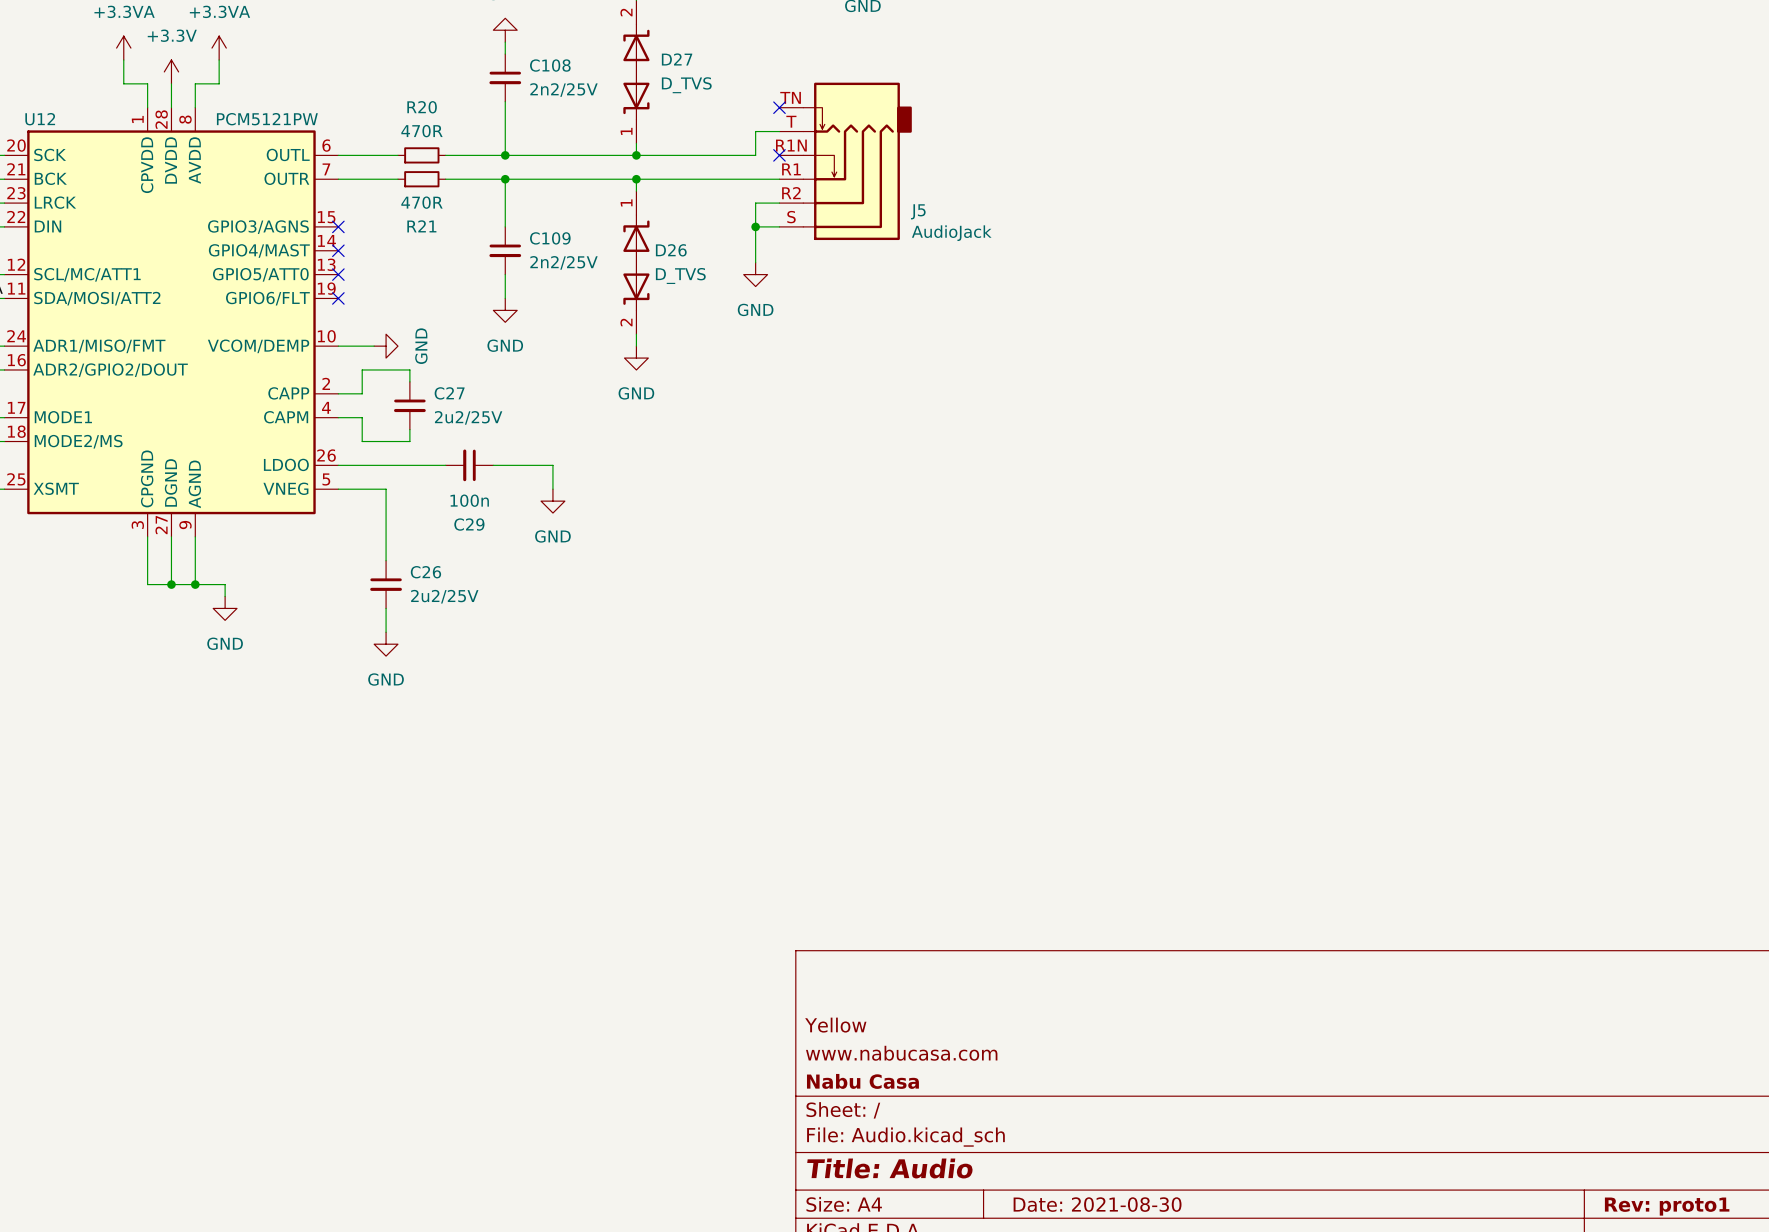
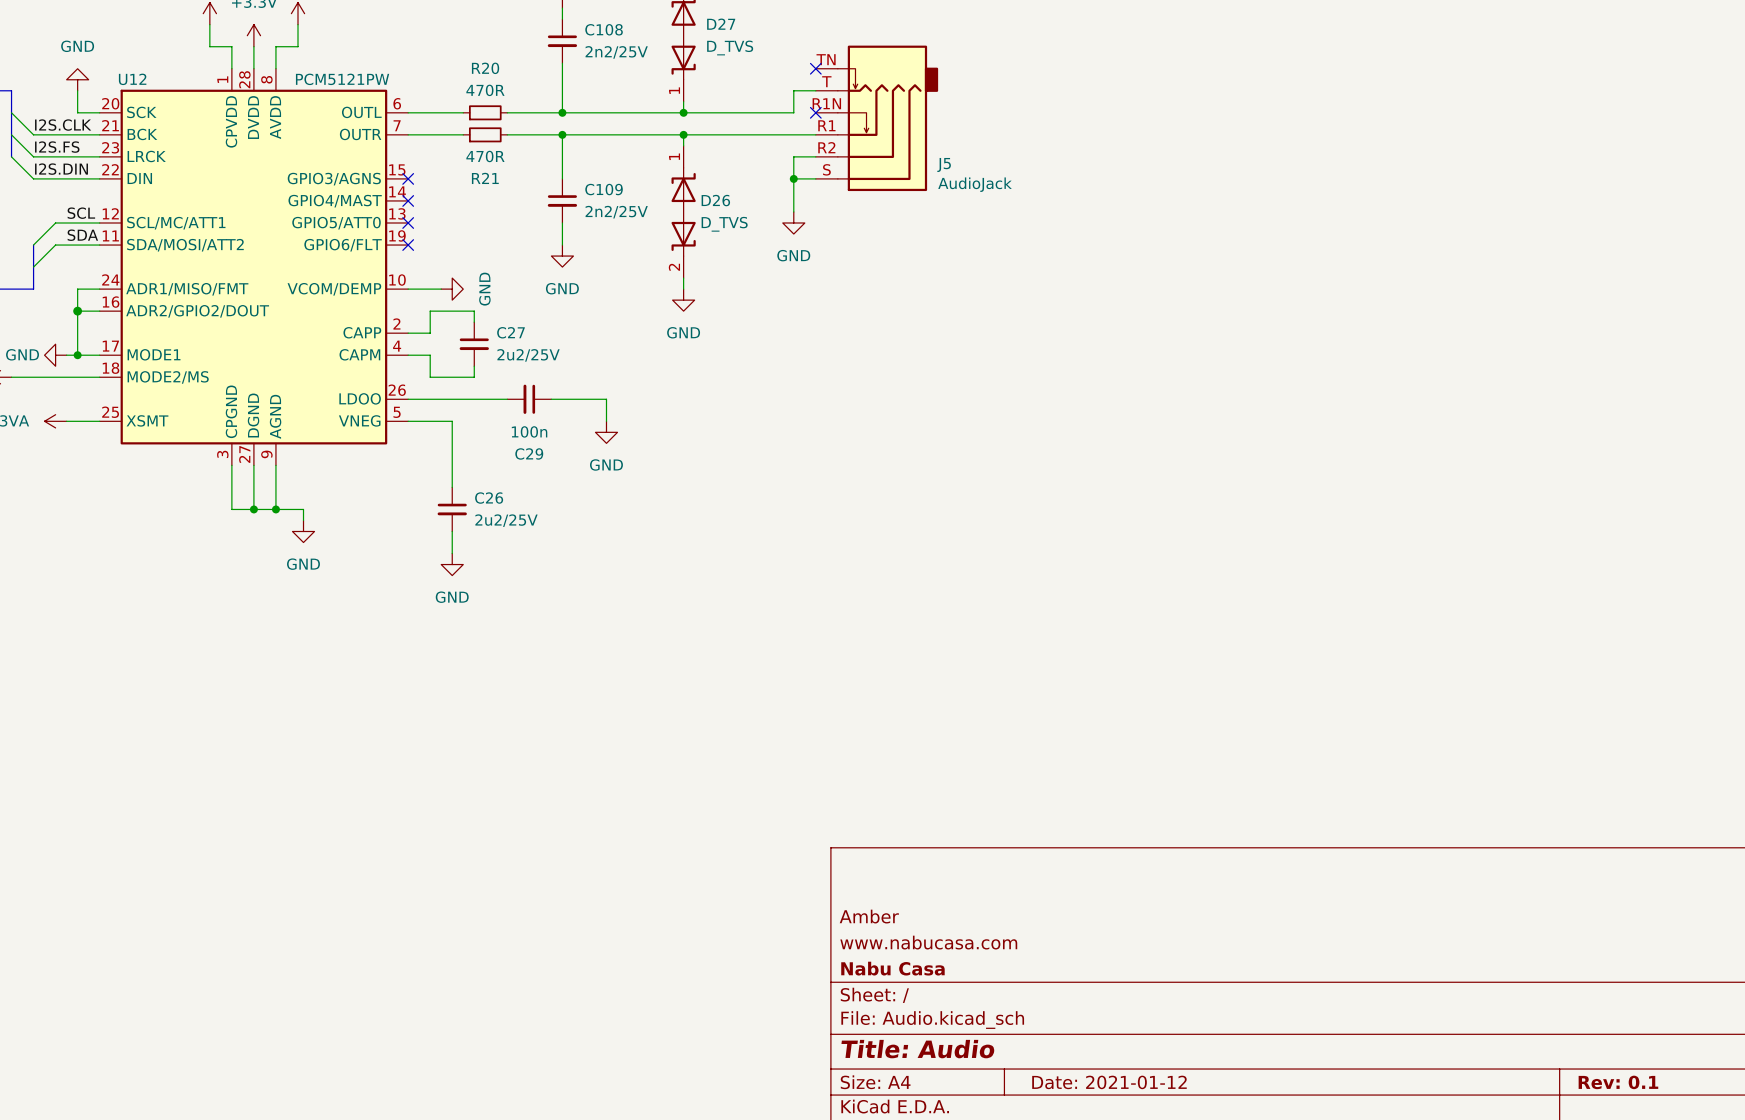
title block: Yellow (835, 1025) -> Amber (869, 916)
title block: Date: 2021-08-30 (1097, 1204) -> Date: 2021-01-12 (1109, 1082)
title block: Rev: proto1 (1667, 1206) -> Rev: 0.1 (1618, 1082)

